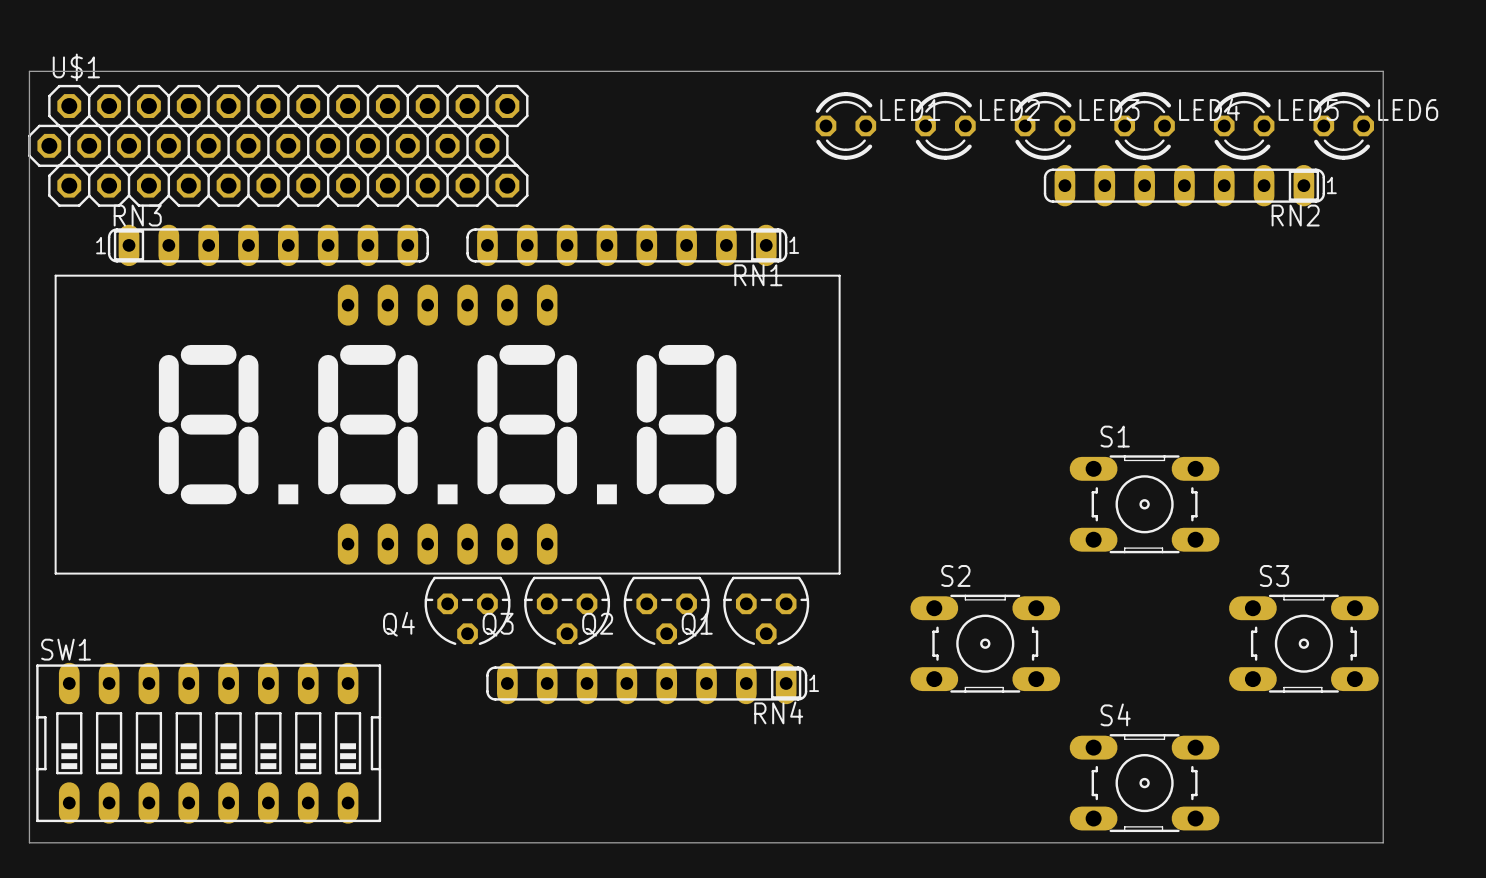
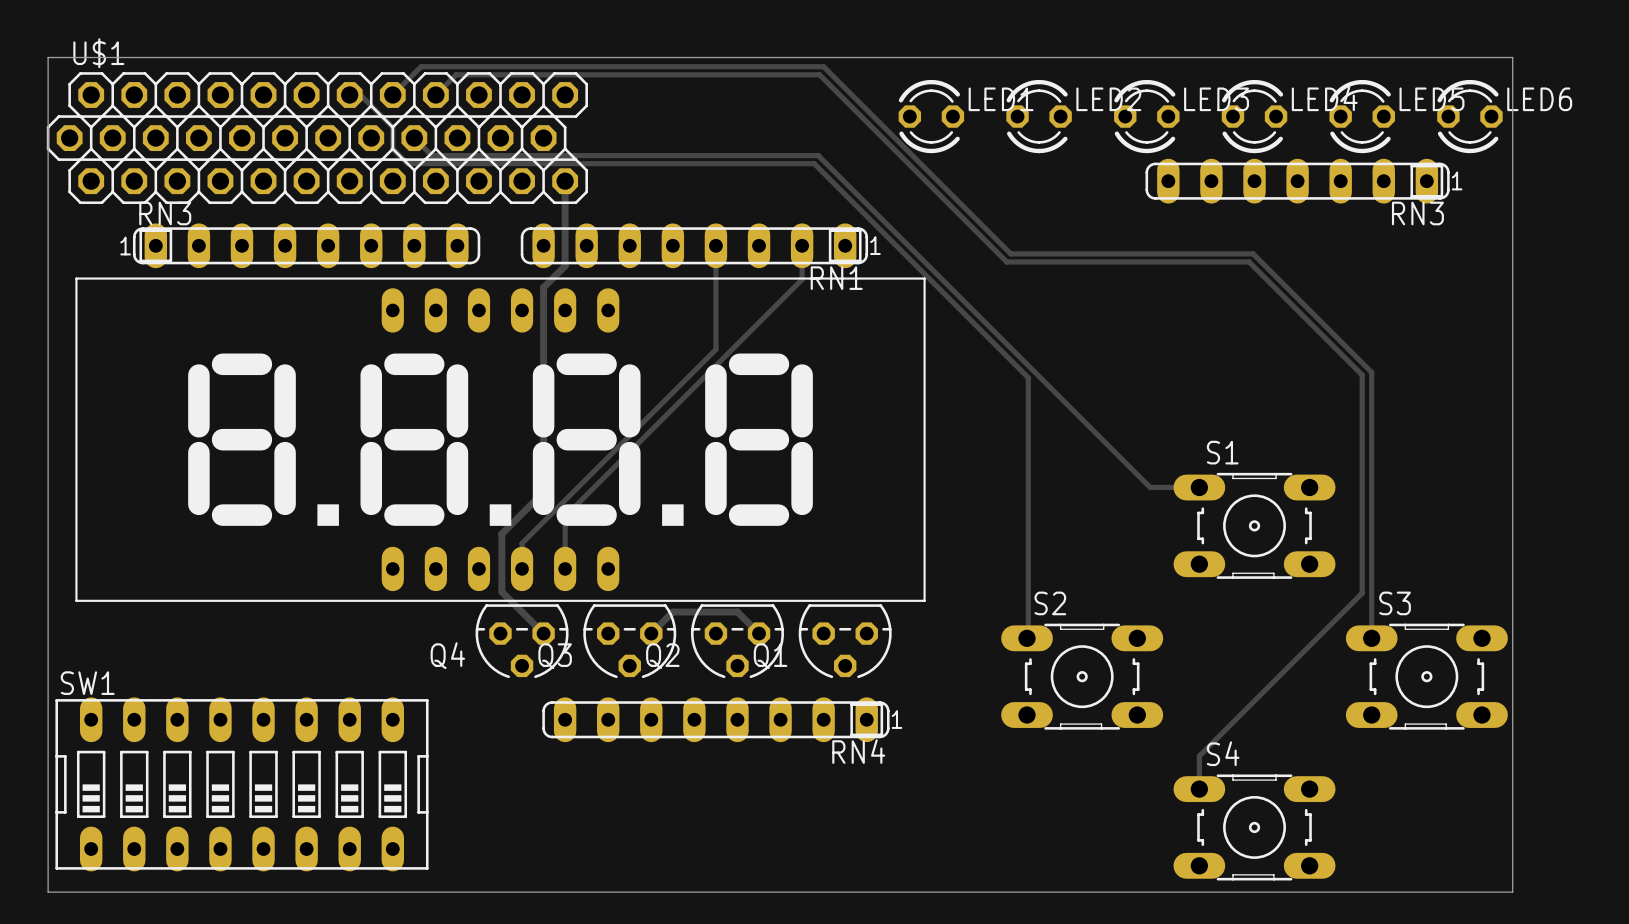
track: none -> (349, 95) (360, 95) (392, 127) (392, 148) (407, 163) (814, 163) (1028, 377) (1027, 638)
track: none -> (392, 95) (421, 66) (823, 66) (1010, 253) (1253, 253) (1371, 372) (1371, 638)
track: none -> (435, 95) (456, 74) (819, 74) (1006, 261) (1249, 261) (1362, 375) (1362, 593) (1199, 756) (1199, 789)
track: none -> (414, 138) (431, 155) (818, 155) (1150, 487) (1199, 487)
track: none -> (565, 181) (565, 266) (543, 287) (543, 492) (501, 533) (501, 591) (543, 633)
RN2 name: RN2 (1295, 215) -> RN3 (1417, 213)
track: none -> (715, 245) (715, 349) (522, 543) (522, 568)
track: none -> (802, 245) (802, 279) (565, 516) (565, 568)
track: none -> (651, 633) (672, 612) (737, 612) (759, 633)

